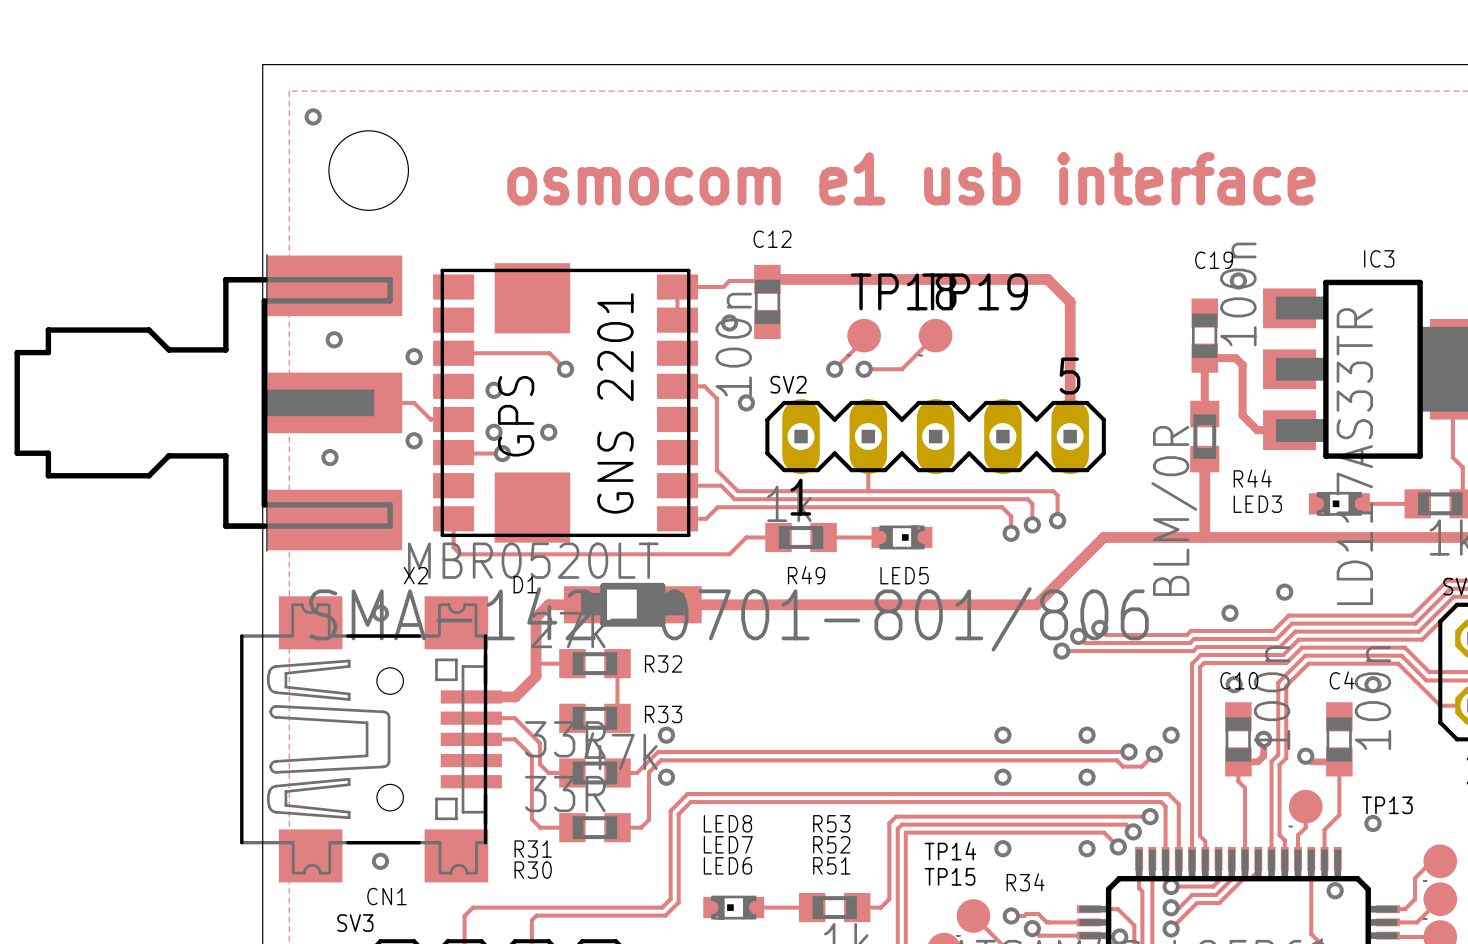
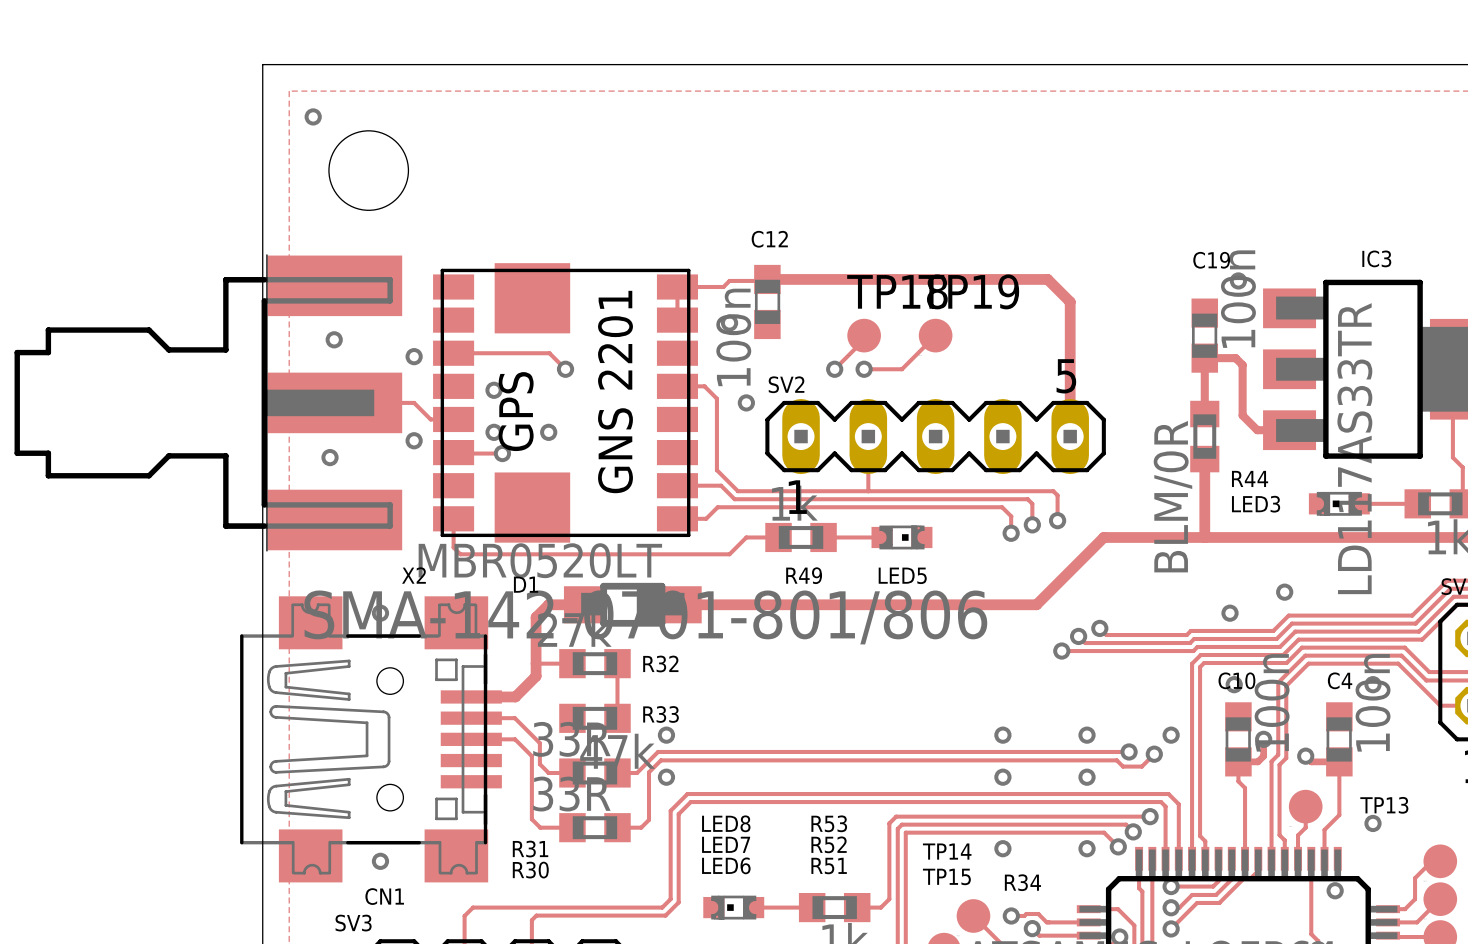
text: osmocom e1 usb interface (911, 178) -> none

